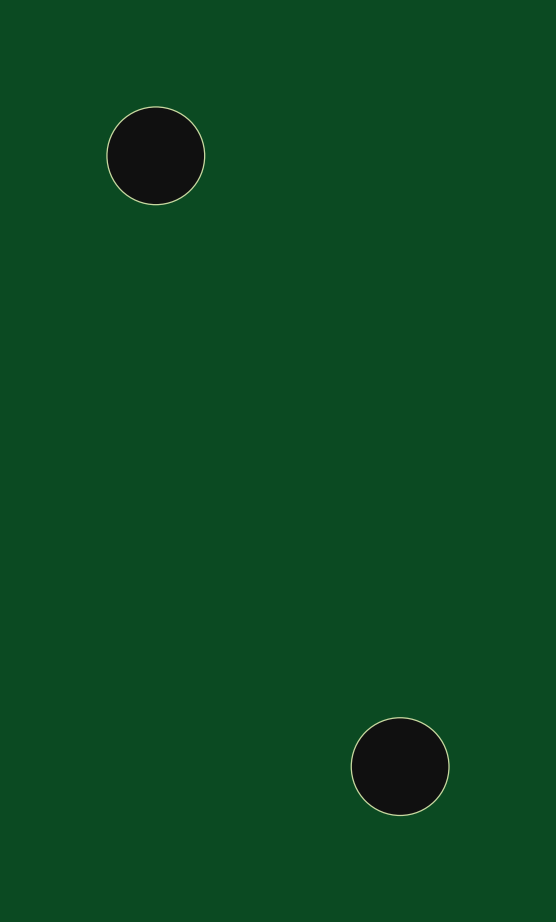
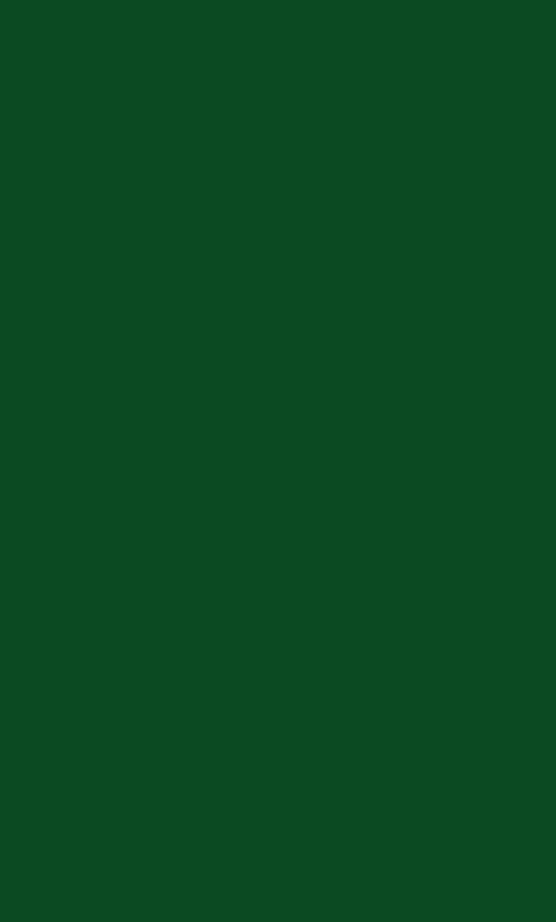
part: (155, 155) -> none
part: (400, 766) -> none

